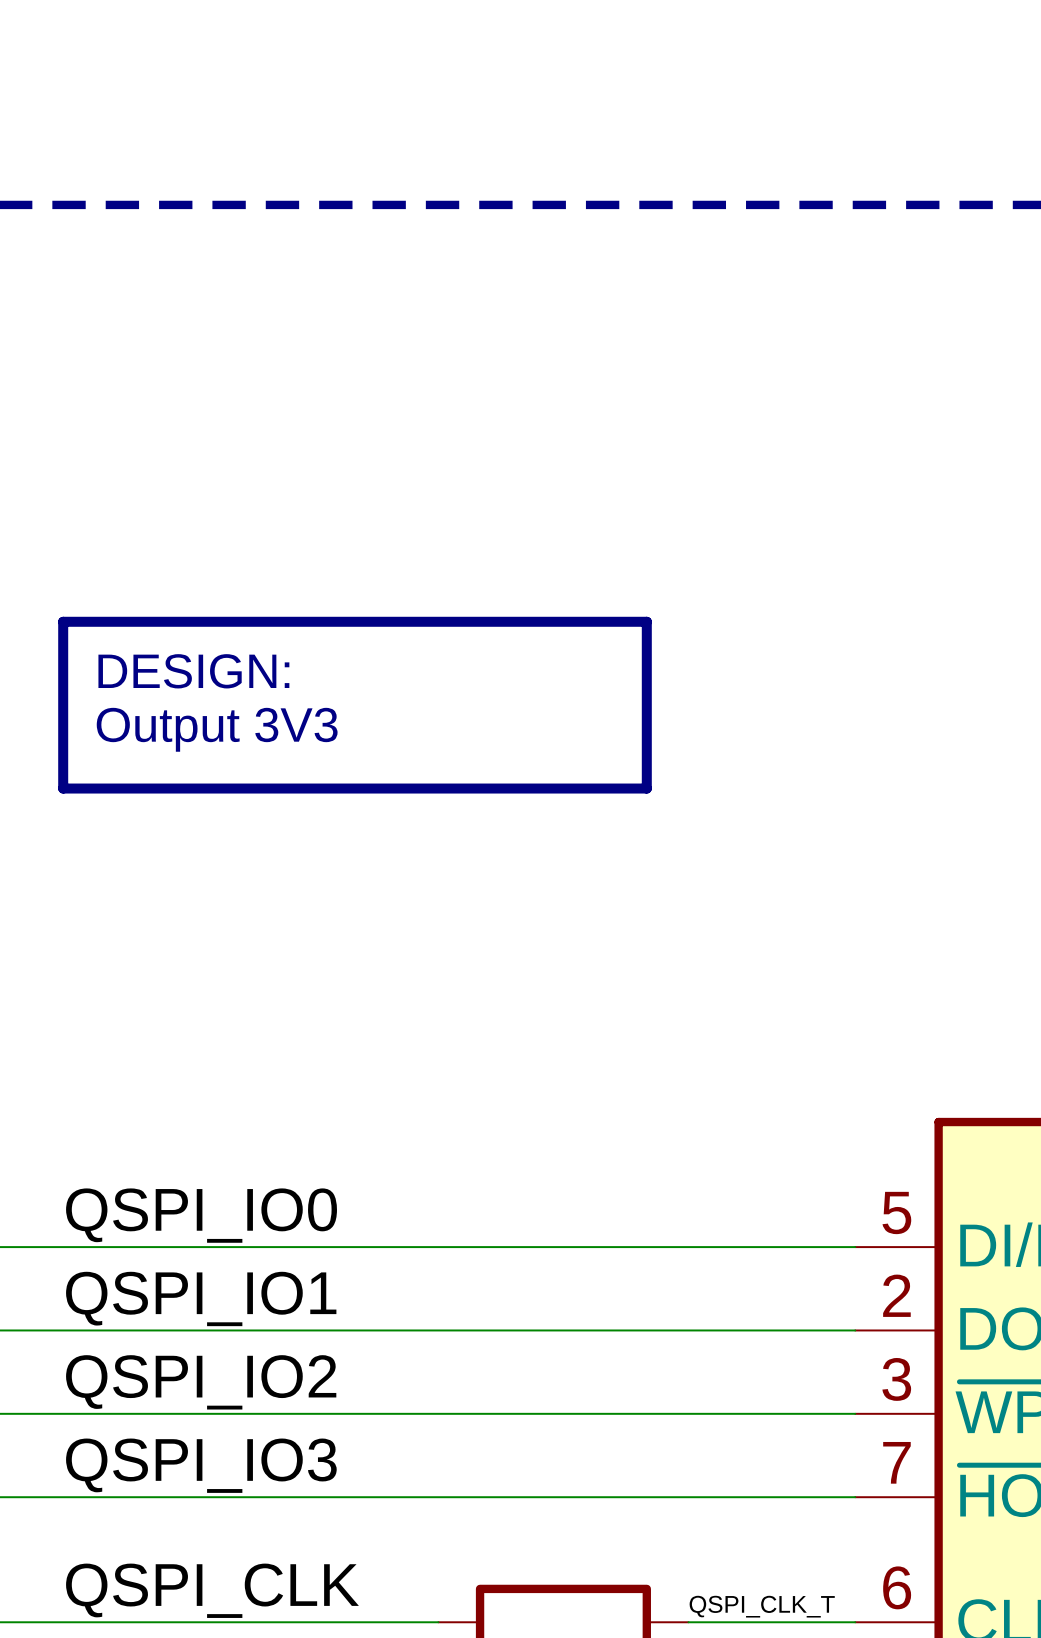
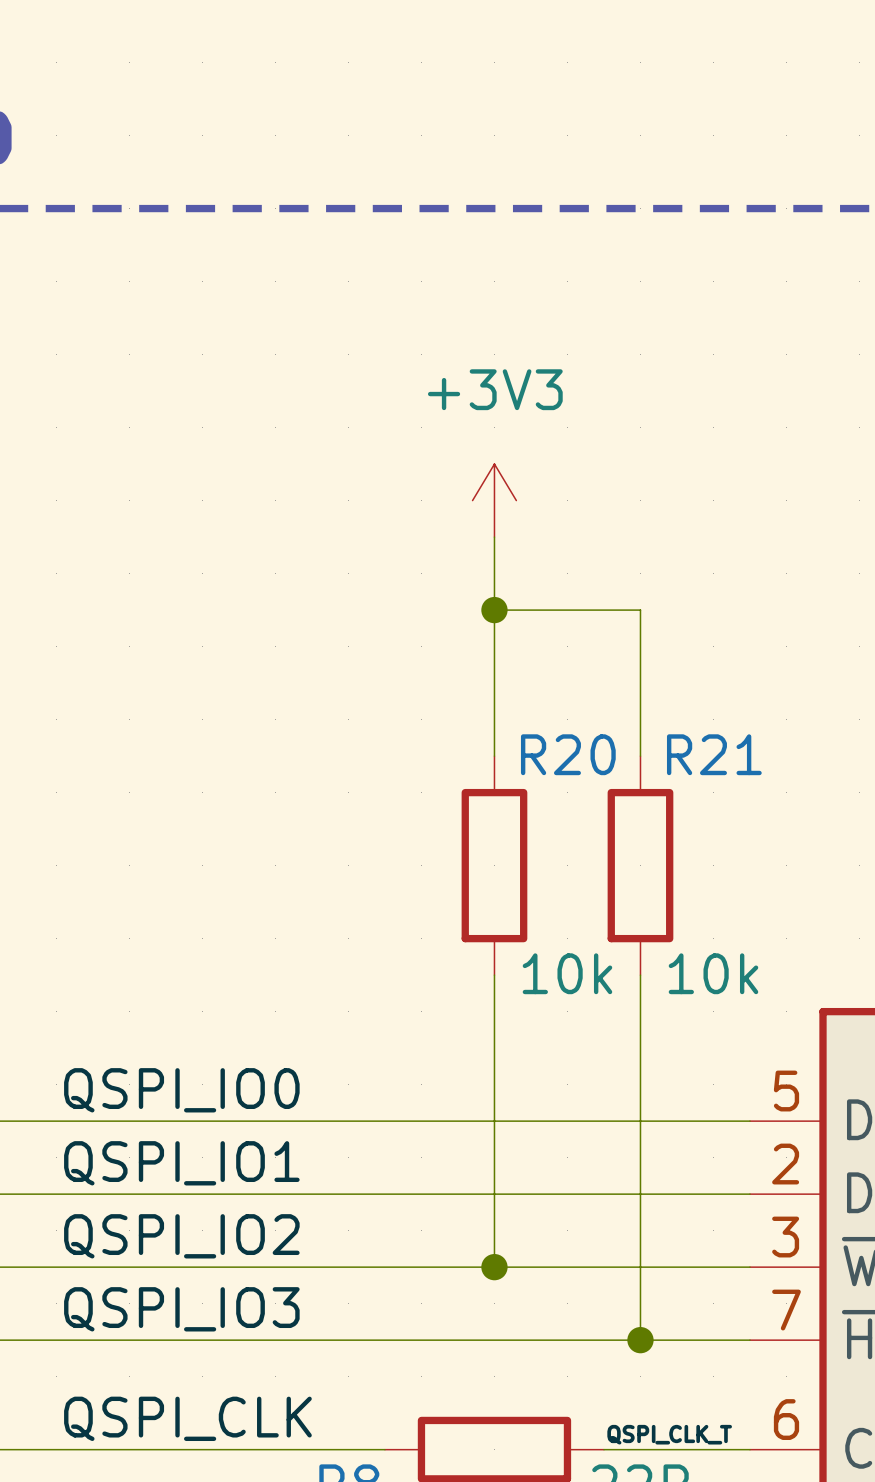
power symbol: none -> +3V3 (494, 500)
wire: none -> (494, 537) (494, 756)
line: (63, 621) (646, 621) (646, 788) (63, 788) (63, 621) -> none
wire: none -> (494, 610) (640, 610) (640, 756)
junction: none -> (494, 610)
text: DESIGN: (193, 671) -> none
text: Output 3V3 (217, 729) -> none
R20: none -> 10k (494, 865)
R21: none -> 10k (640, 865)
wire: none -> (494, 975) (494, 1267)
wire: none -> (640, 975) (640, 1340)
junction: none -> (494, 1267)
junction: none -> (640, 1340)

